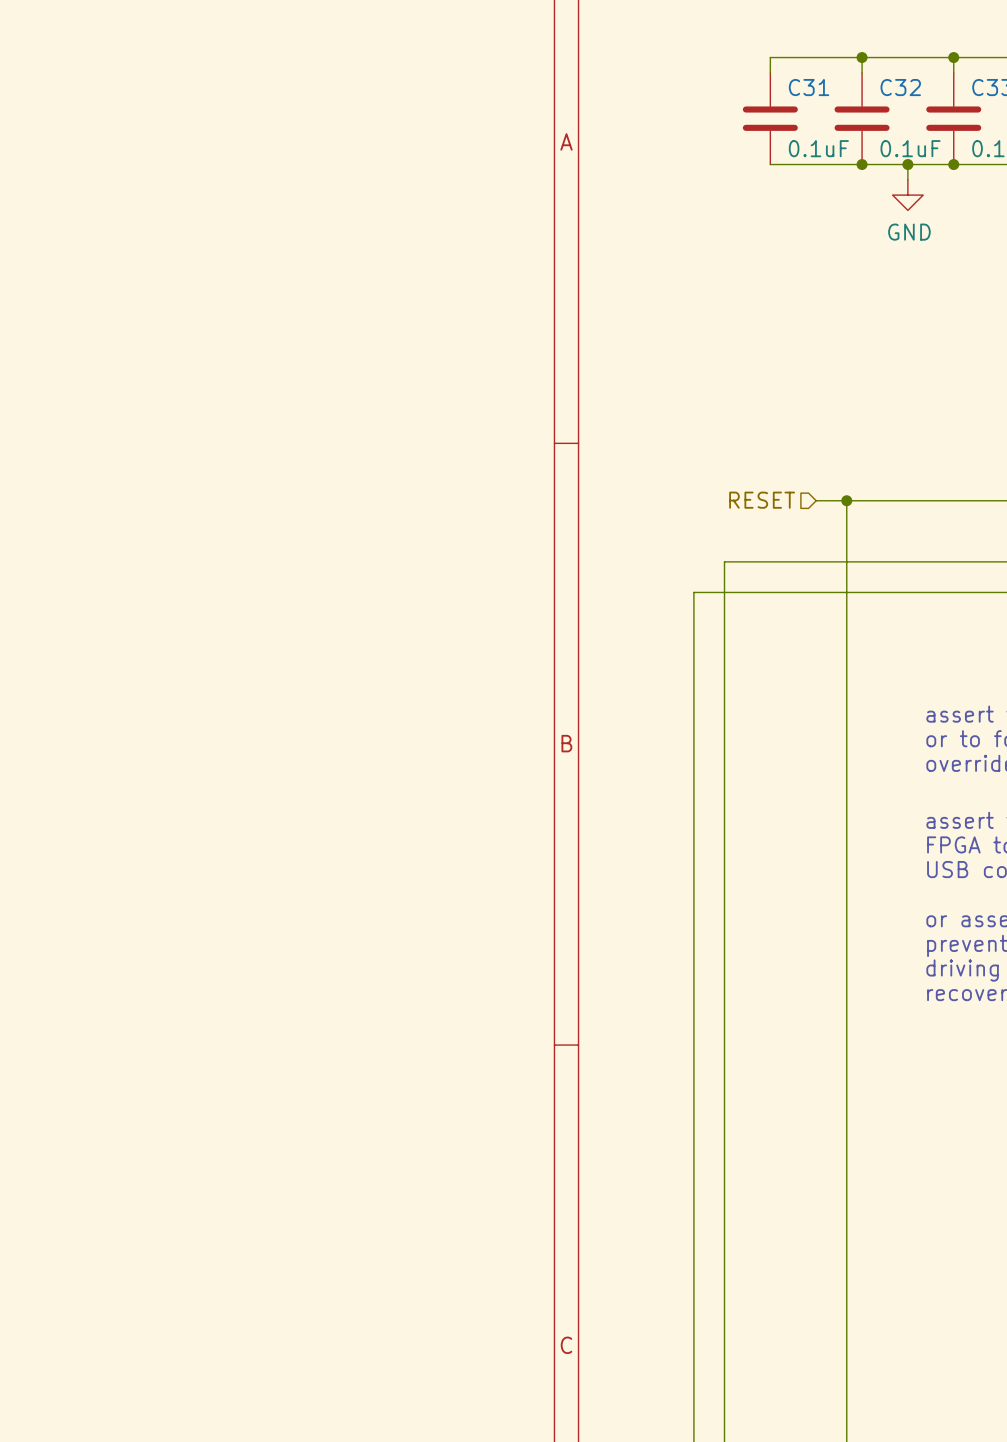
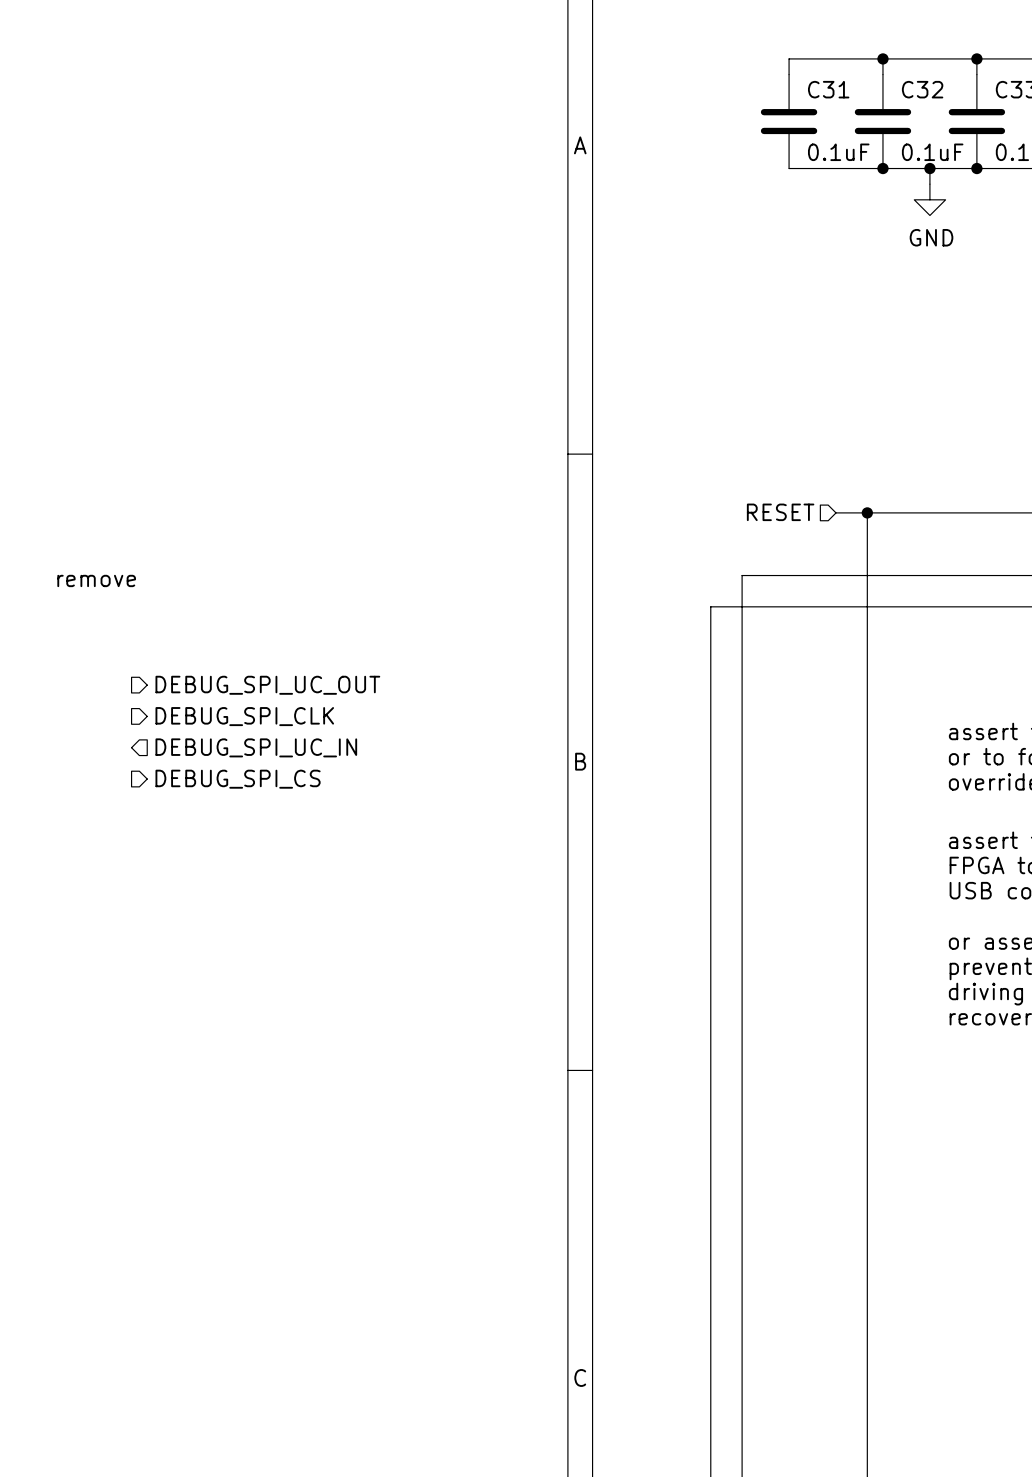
text: none -> remove (96, 580)
hierarchical label: none -> DEBUG_SPI_UC_OUT (267, 685)
hierarchical label: none -> DEBUG_SPI_CLK (244, 716)
hierarchical label: none -> DEBUG_SPI_UC_IN (256, 747)
hierarchical label: none -> DEBUG_SPI_CS (238, 779)

